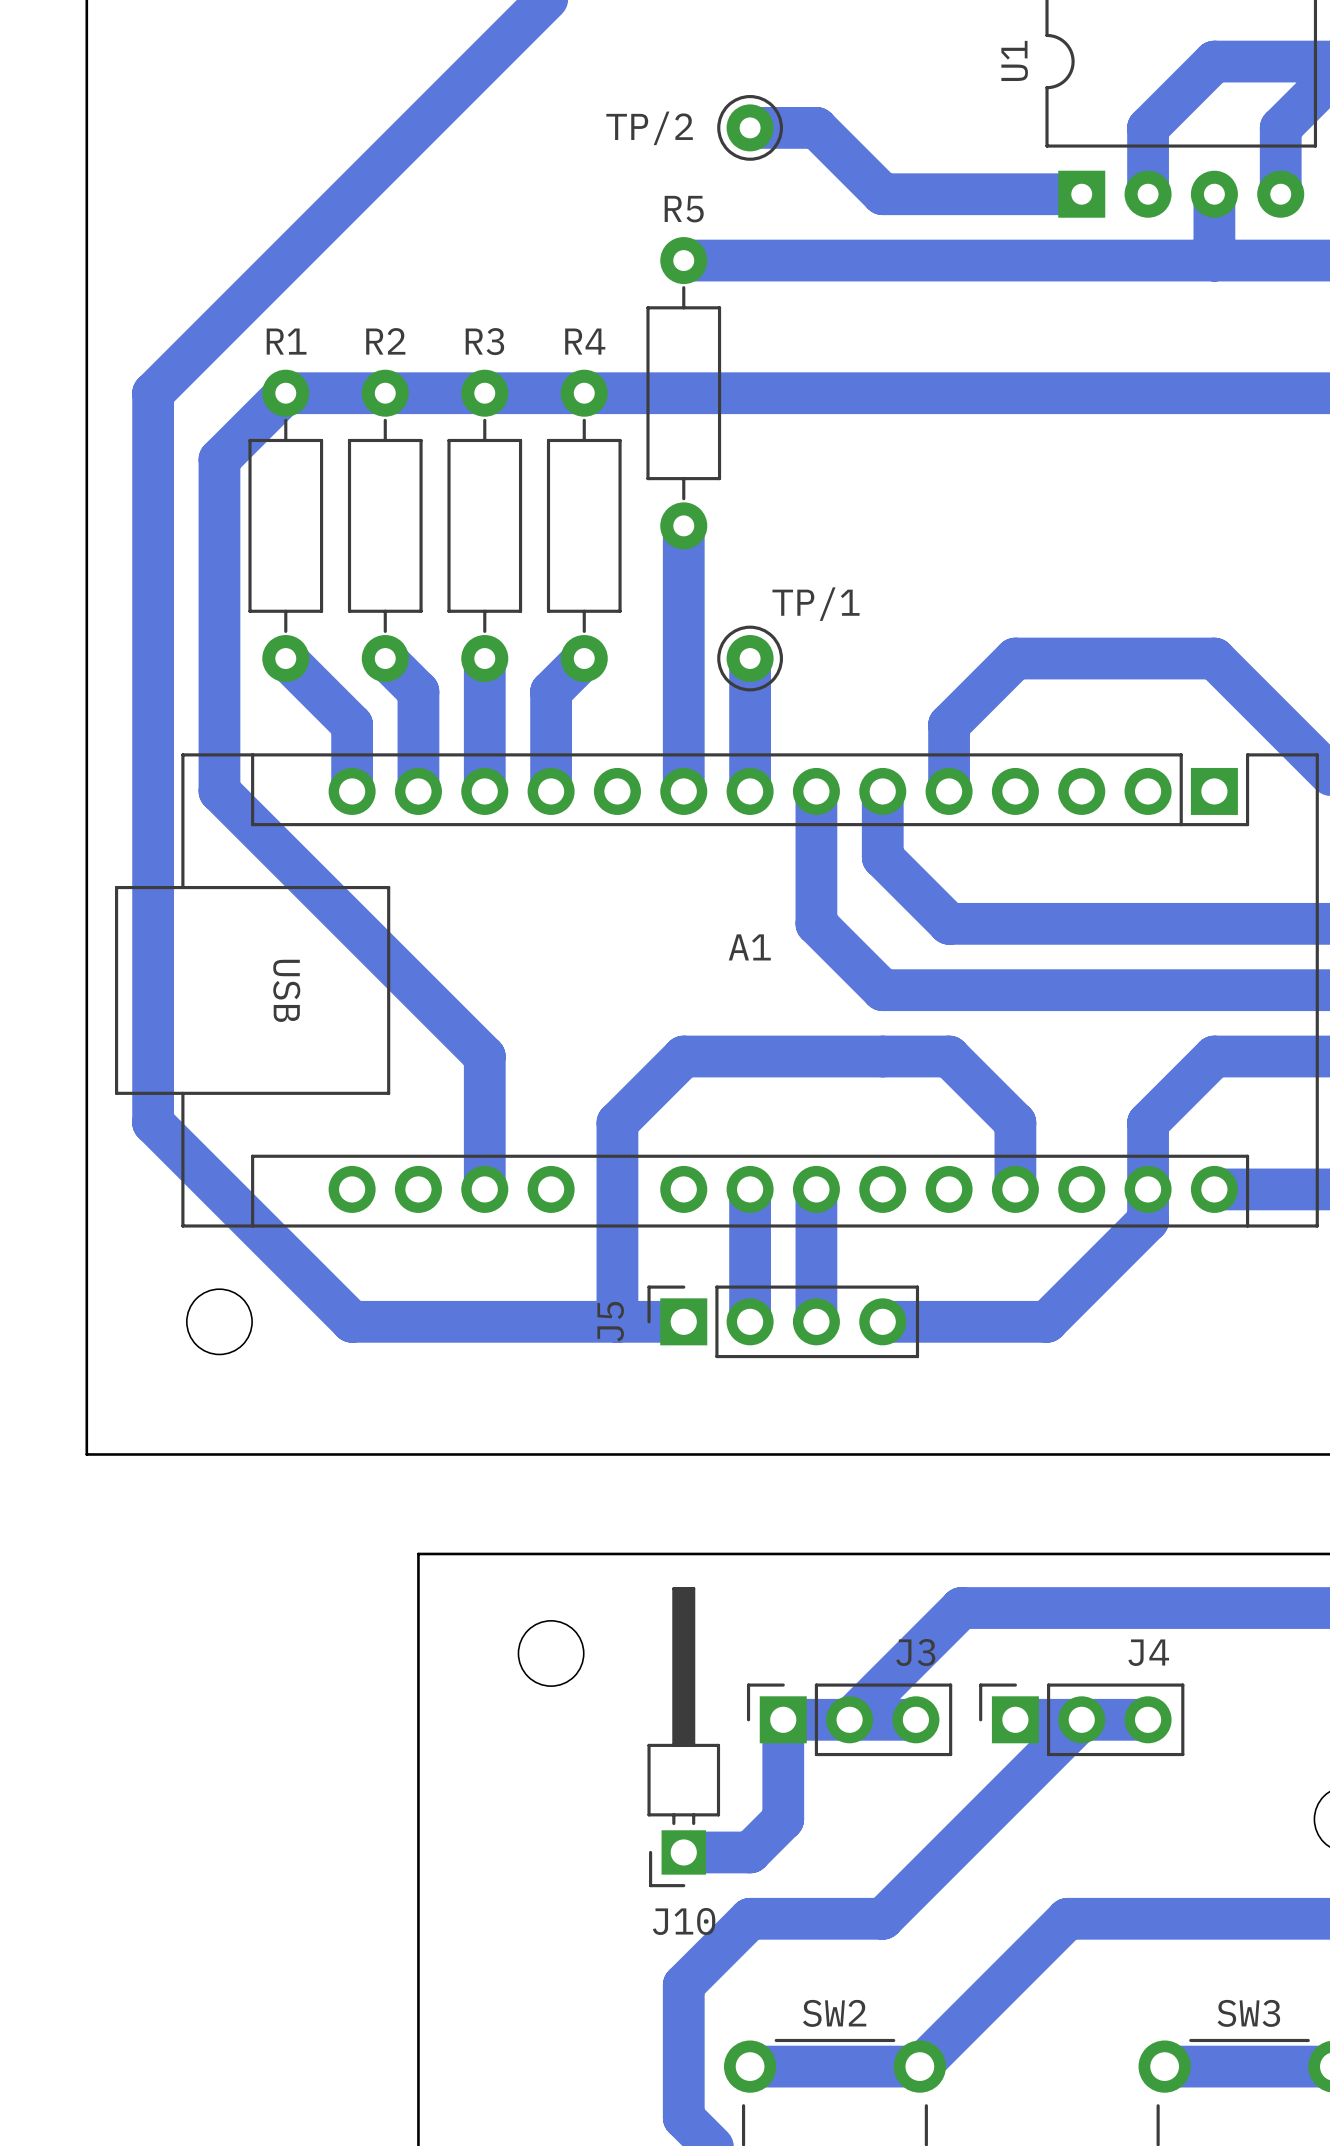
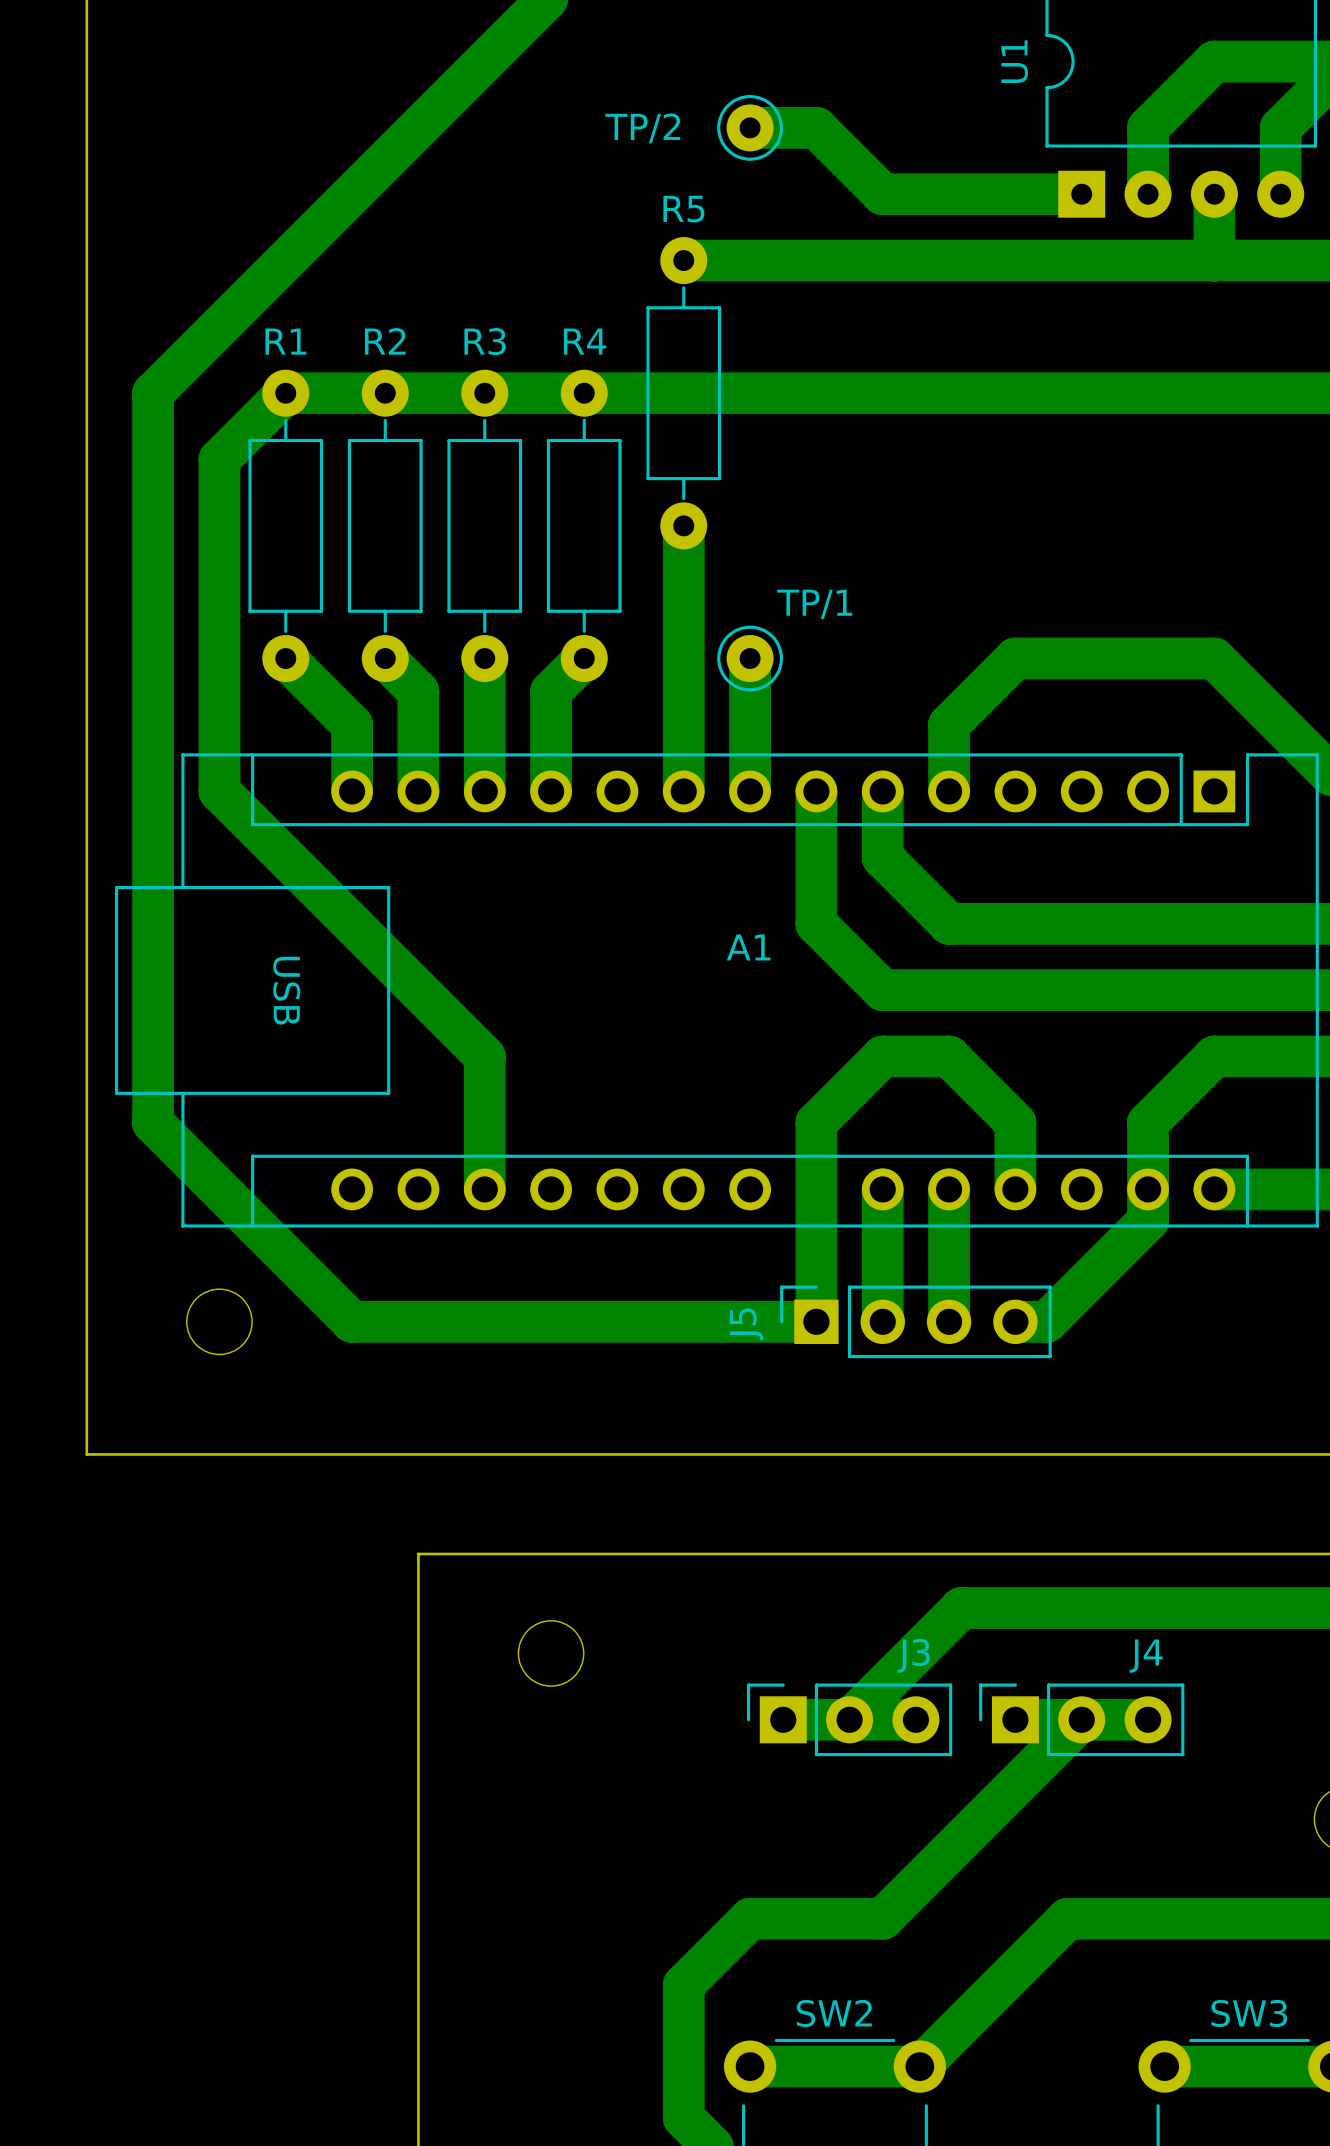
A1 footprint: [115, 753, 1319, 1228] -> [115, 753, 1319, 1228]
bottom track: (882, 1056) (683, 1056) (617, 1122) (617, 1321) -> (882, 1056) (816, 1122) (816, 1189)
bottom track: (750, 1189) (750, 1321) -> (949, 1189) (949, 1321)
J5 footprint: [647, 1285, 920, 1359] -> [780, 1285, 1052, 1359]
bottom track: none -> (683, 1321) (816, 1321)
bottom track: (882, 1321) (1015, 1321) -> (882, 1321) (882, 1189)
bottom track: (783, 1719) (783, 1819) (750, 1852) (683, 1852) -> none
J10: (683, 1737) -> none

